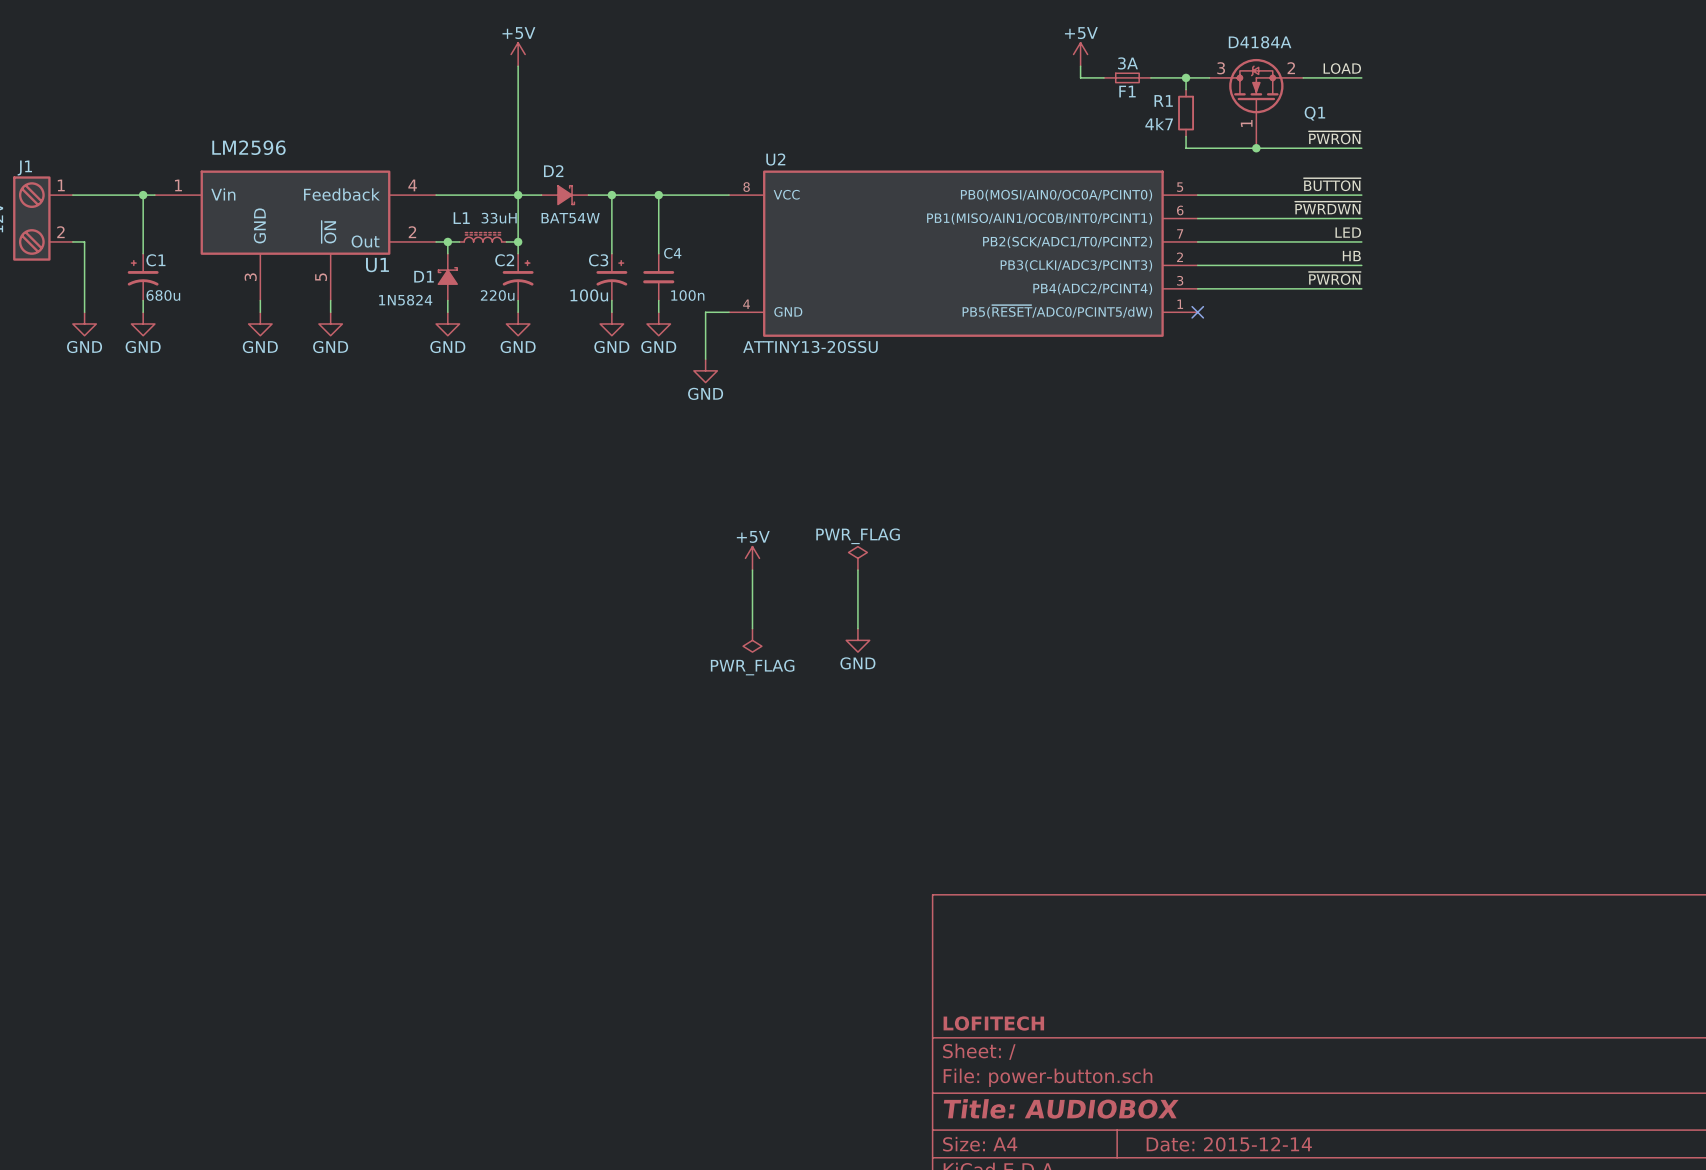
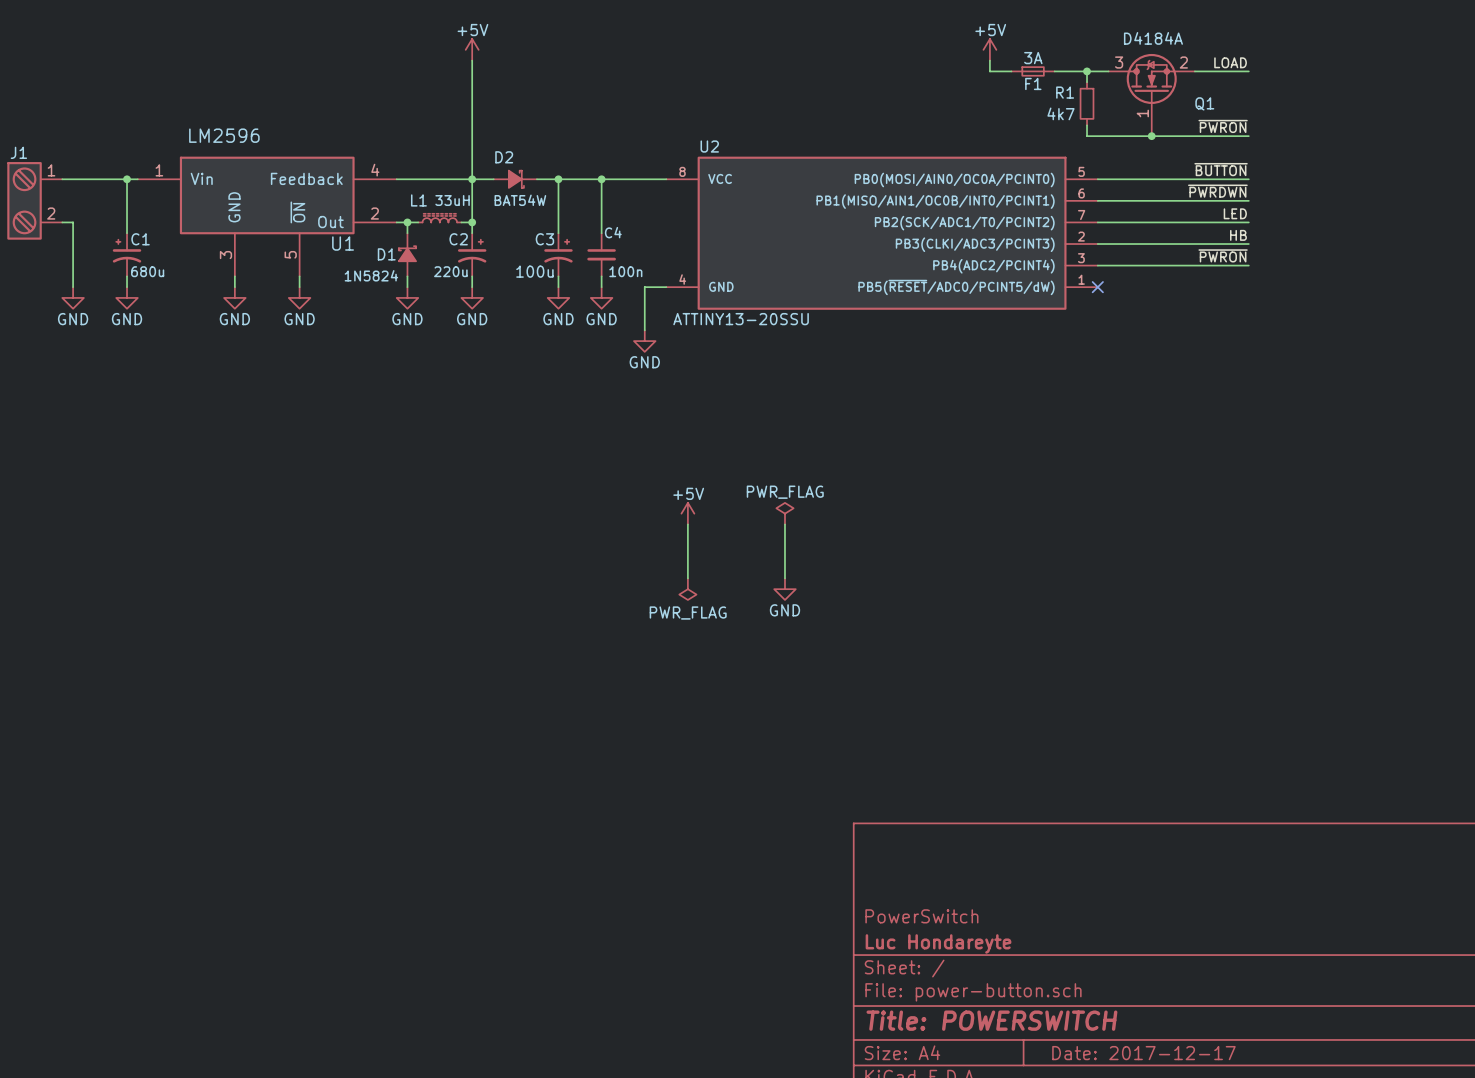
title block: none -> PowerSwitch (921, 916)
title block: LOFITECH (993, 1023) -> Luc Hondareyte (938, 943)
title block: Title: AUDIOBOX (1061, 1108) -> Title: POWERSWITCH (991, 1020)
title block: Date: 2015-12-14 (1229, 1144) -> Date: 2017-12-17 (1143, 1053)

